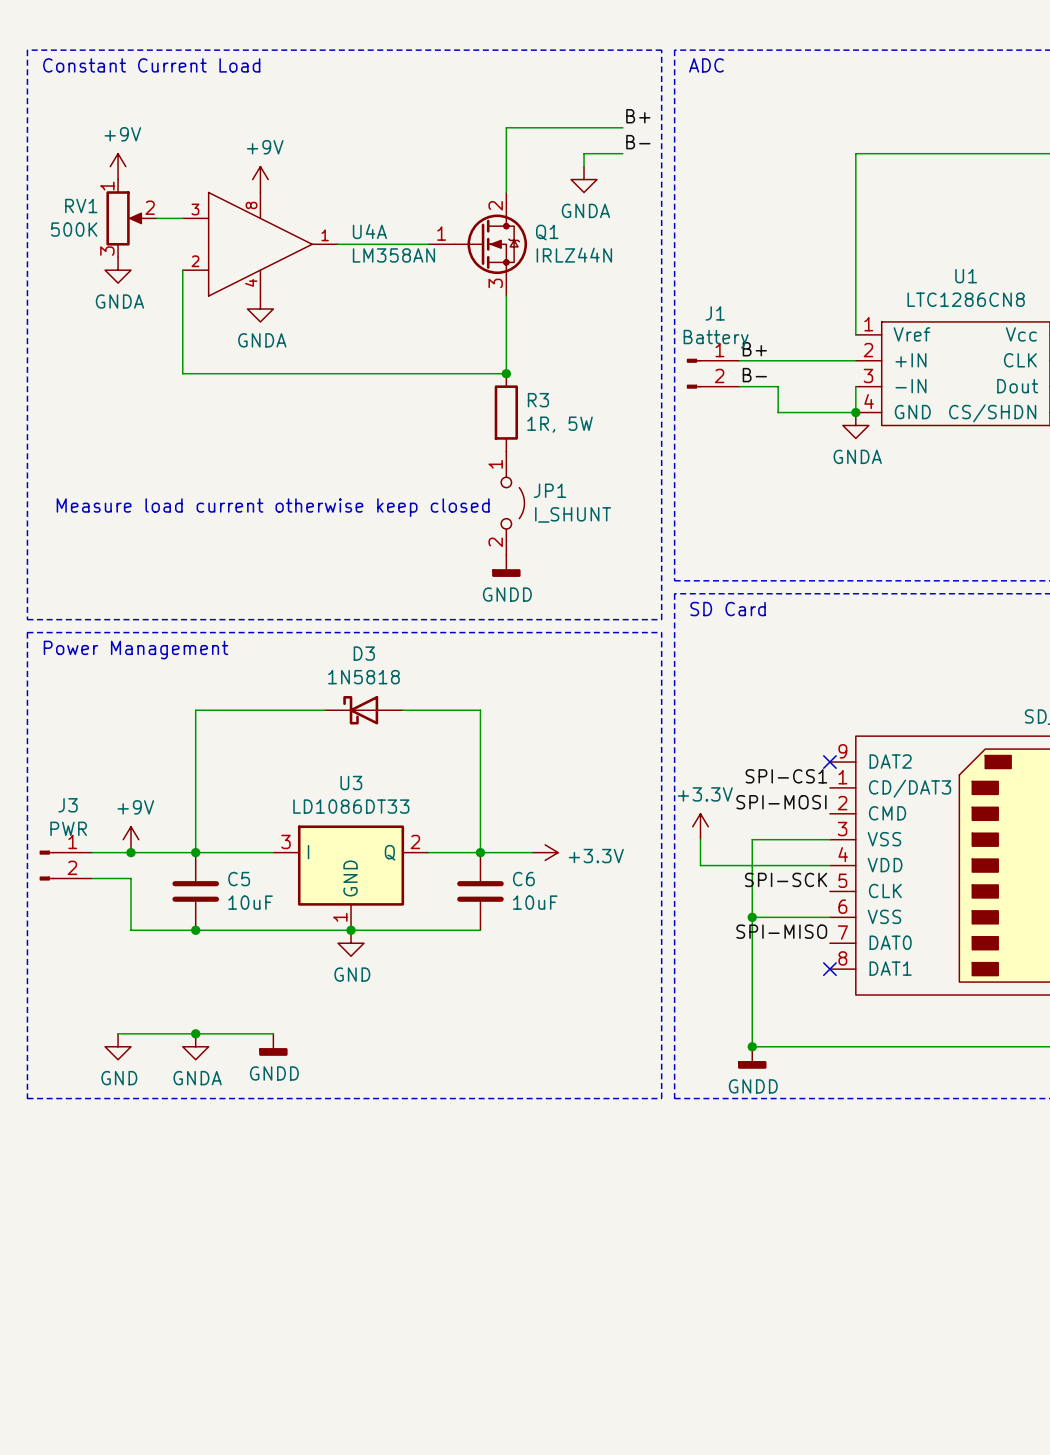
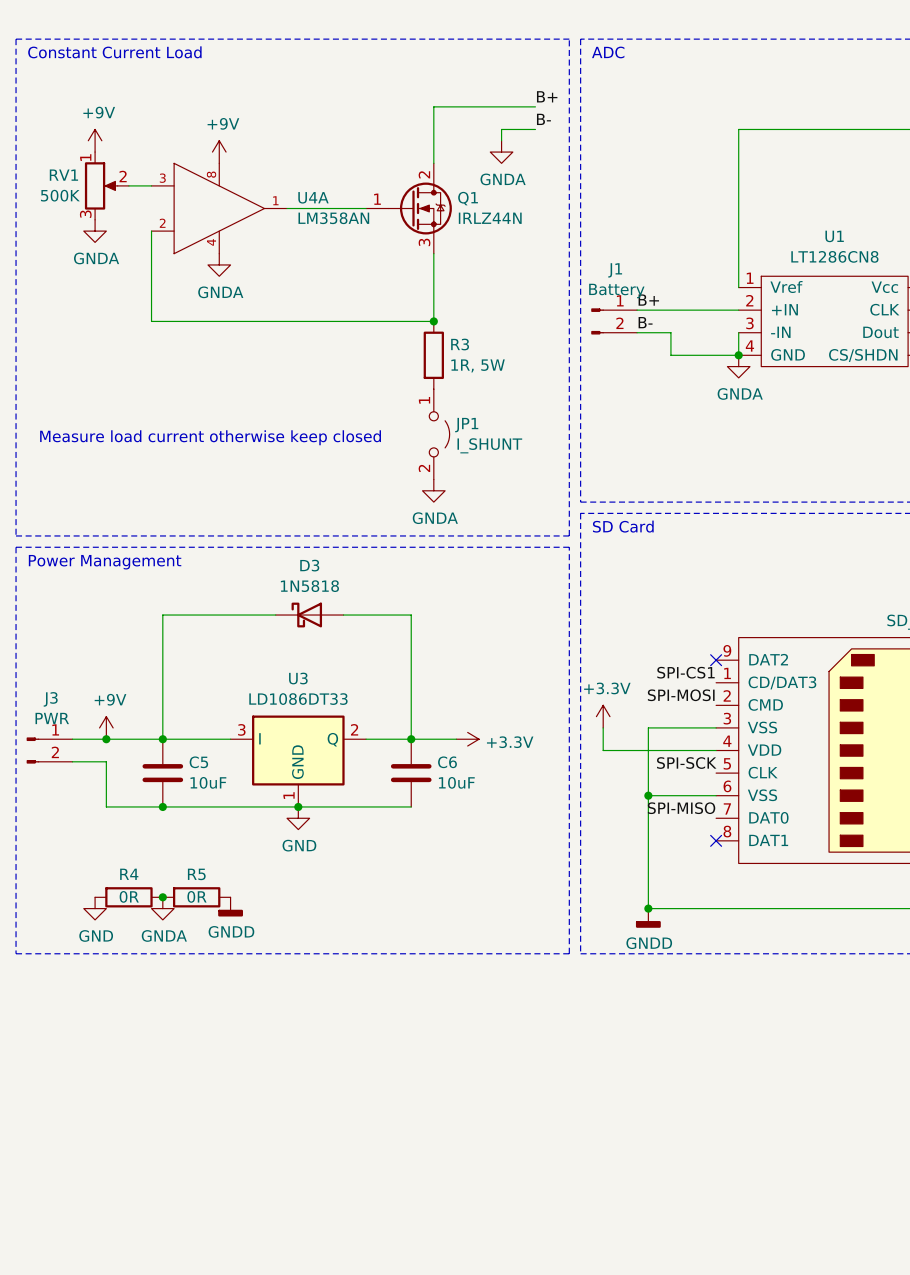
U1 value: LTC1286CN8 (966, 299) -> LT1286CN8 (834, 256)
power symbol: GNDD (506, 565) -> GNDA (433, 490)
wire: (118, 1033) (273, 1033) -> none
R4: none -> 0R (128, 897)
R5: none -> 0R (196, 897)

